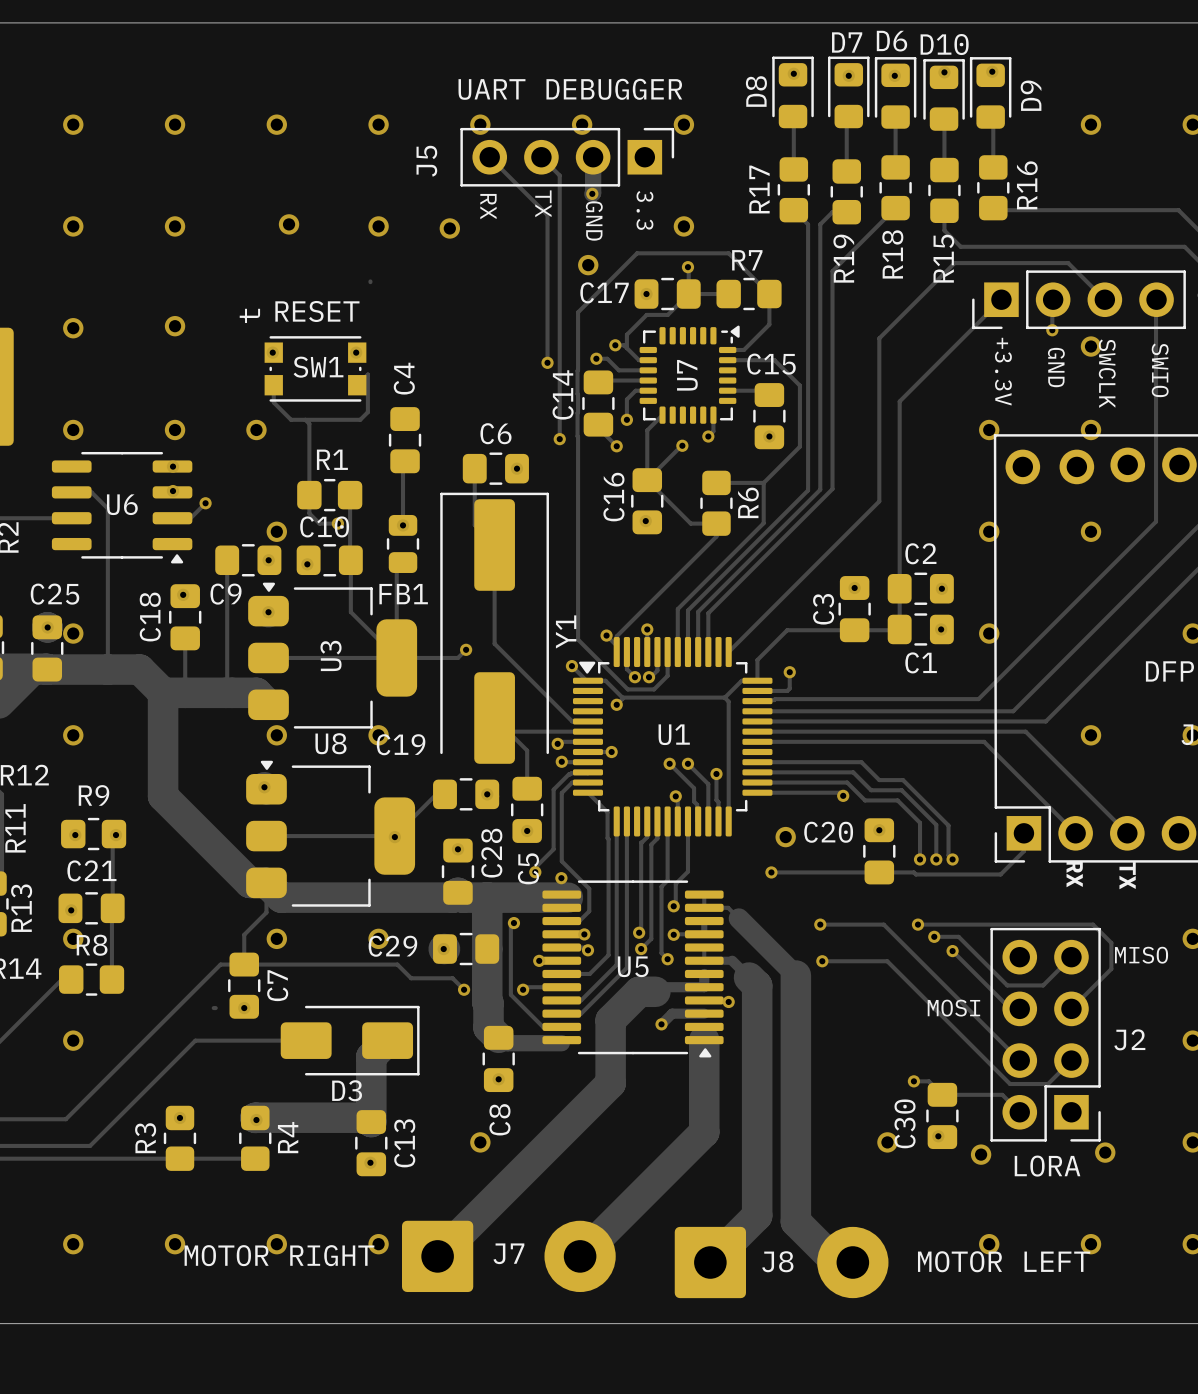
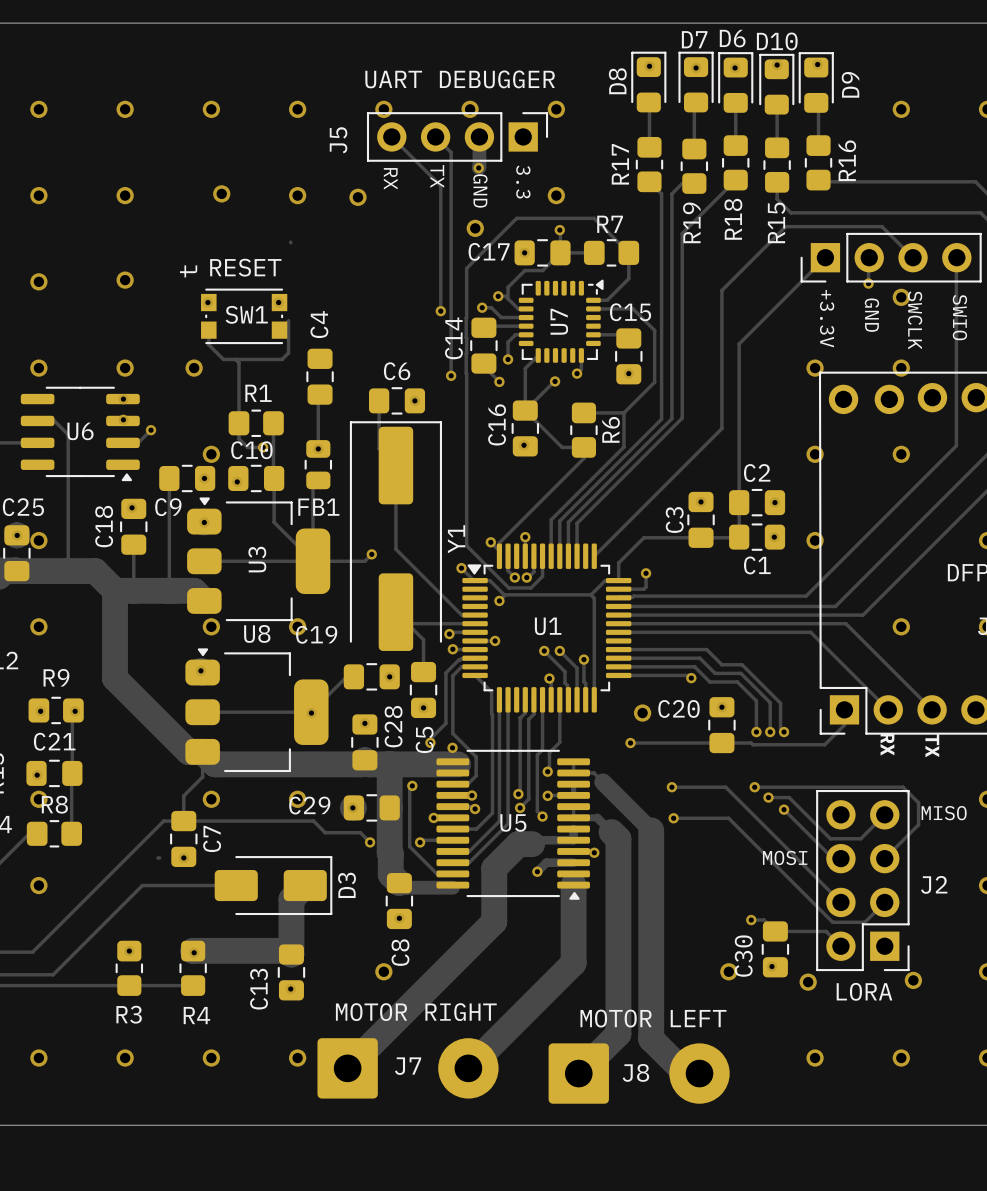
D3 name rotation: 0° (347, 1090) -> 90° counterclockwise (347, 885)
D3 name position: D3 (347, 1090) -> D3 (347, 885)
R4 name rotation: 0° (288, 1137) -> 90° clockwise (196, 1015)
R4 name position: R4 (288, 1137) -> R4 (196, 1015)
R3 name rotation: 0° (145, 1138) -> 90° clockwise (129, 1014)
R3 name position: R3 (145, 1138) -> R3 (129, 1014)
C13 name position: C13 (404, 1143) -> C13 (259, 989)
J7 text position: MOTOR RIGHT (279, 1255) -> MOTOR RIGHT (416, 1012)
J8 text position: MOTOR LEFT (1004, 1261) -> MOTOR LEFT (653, 1018)

